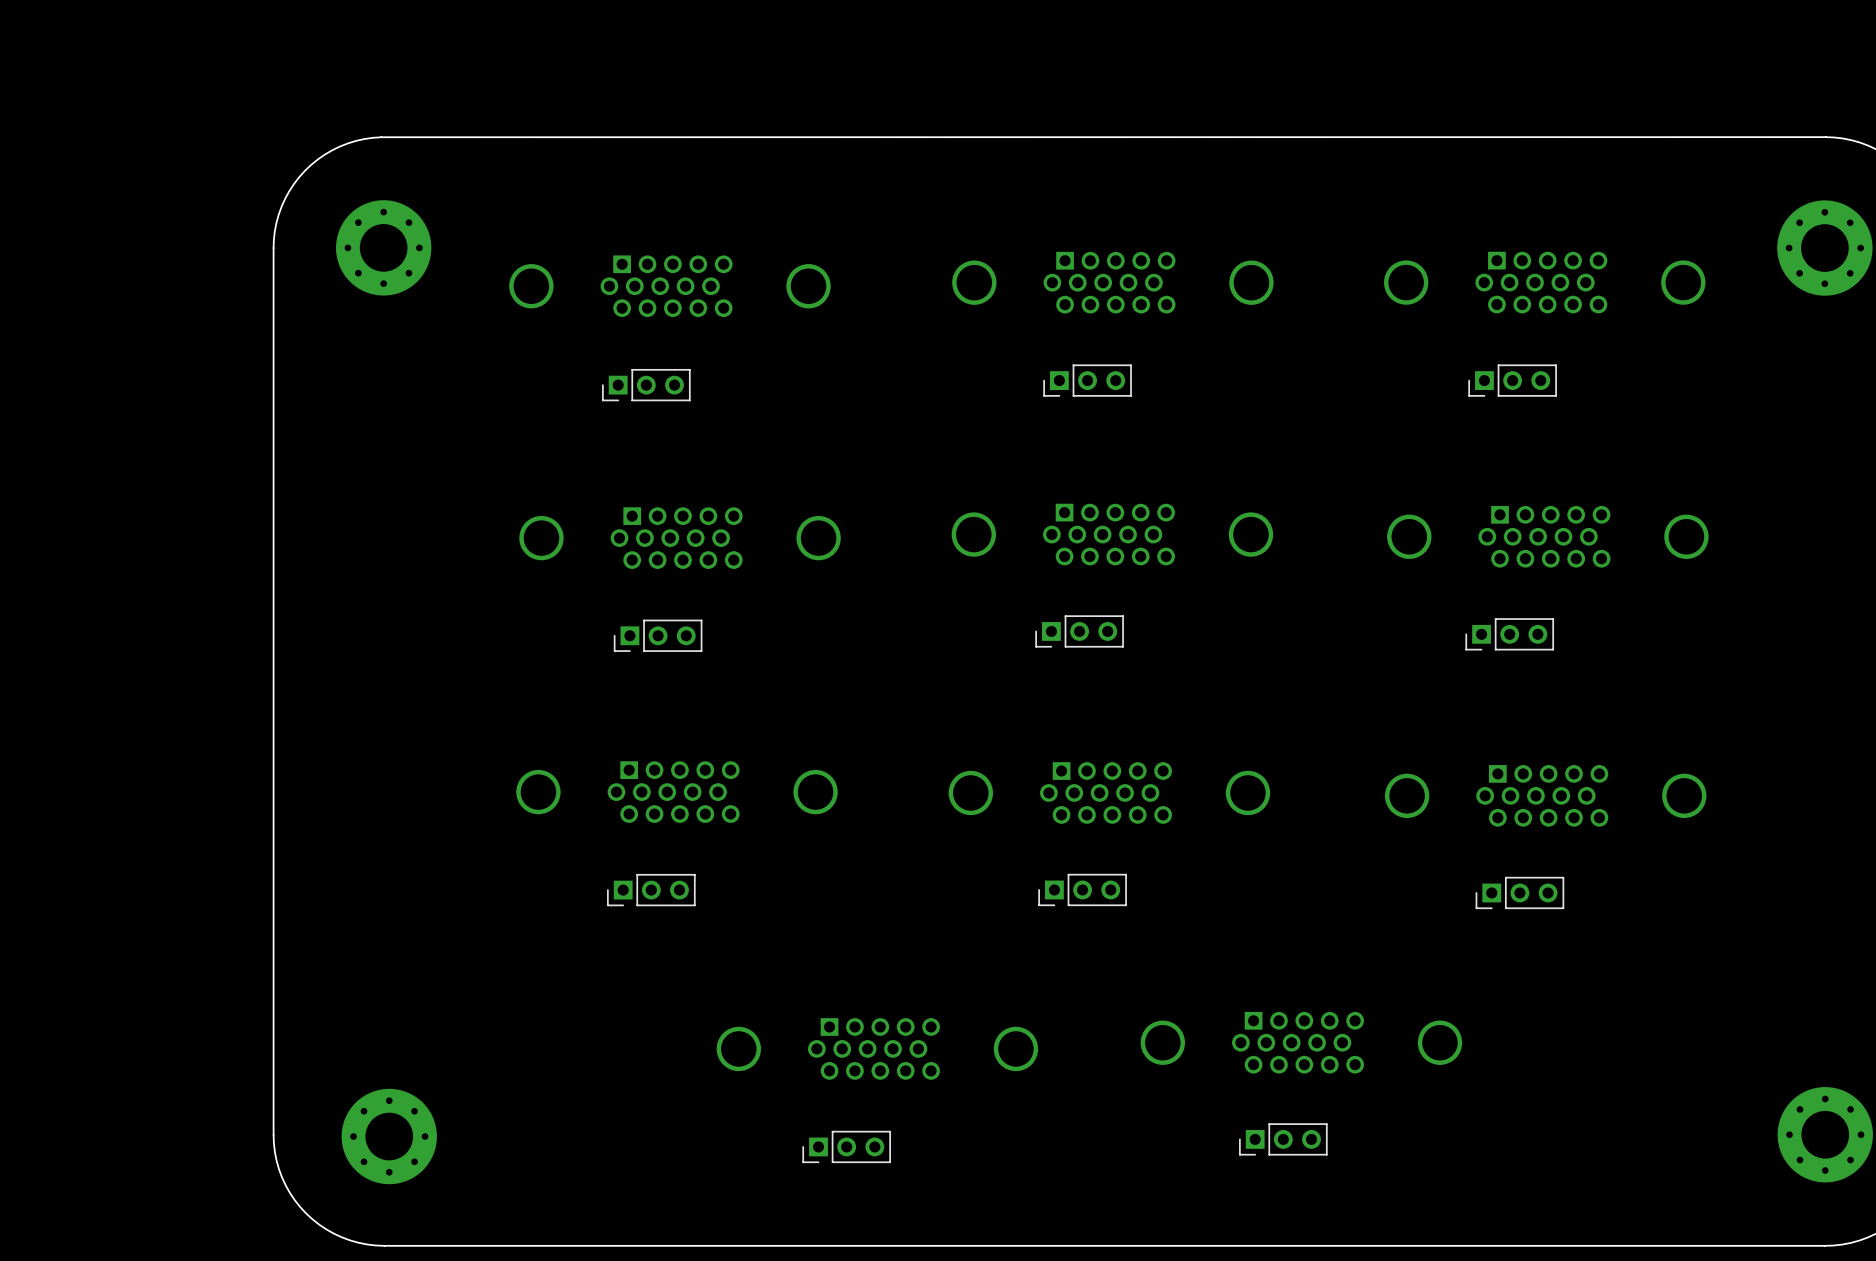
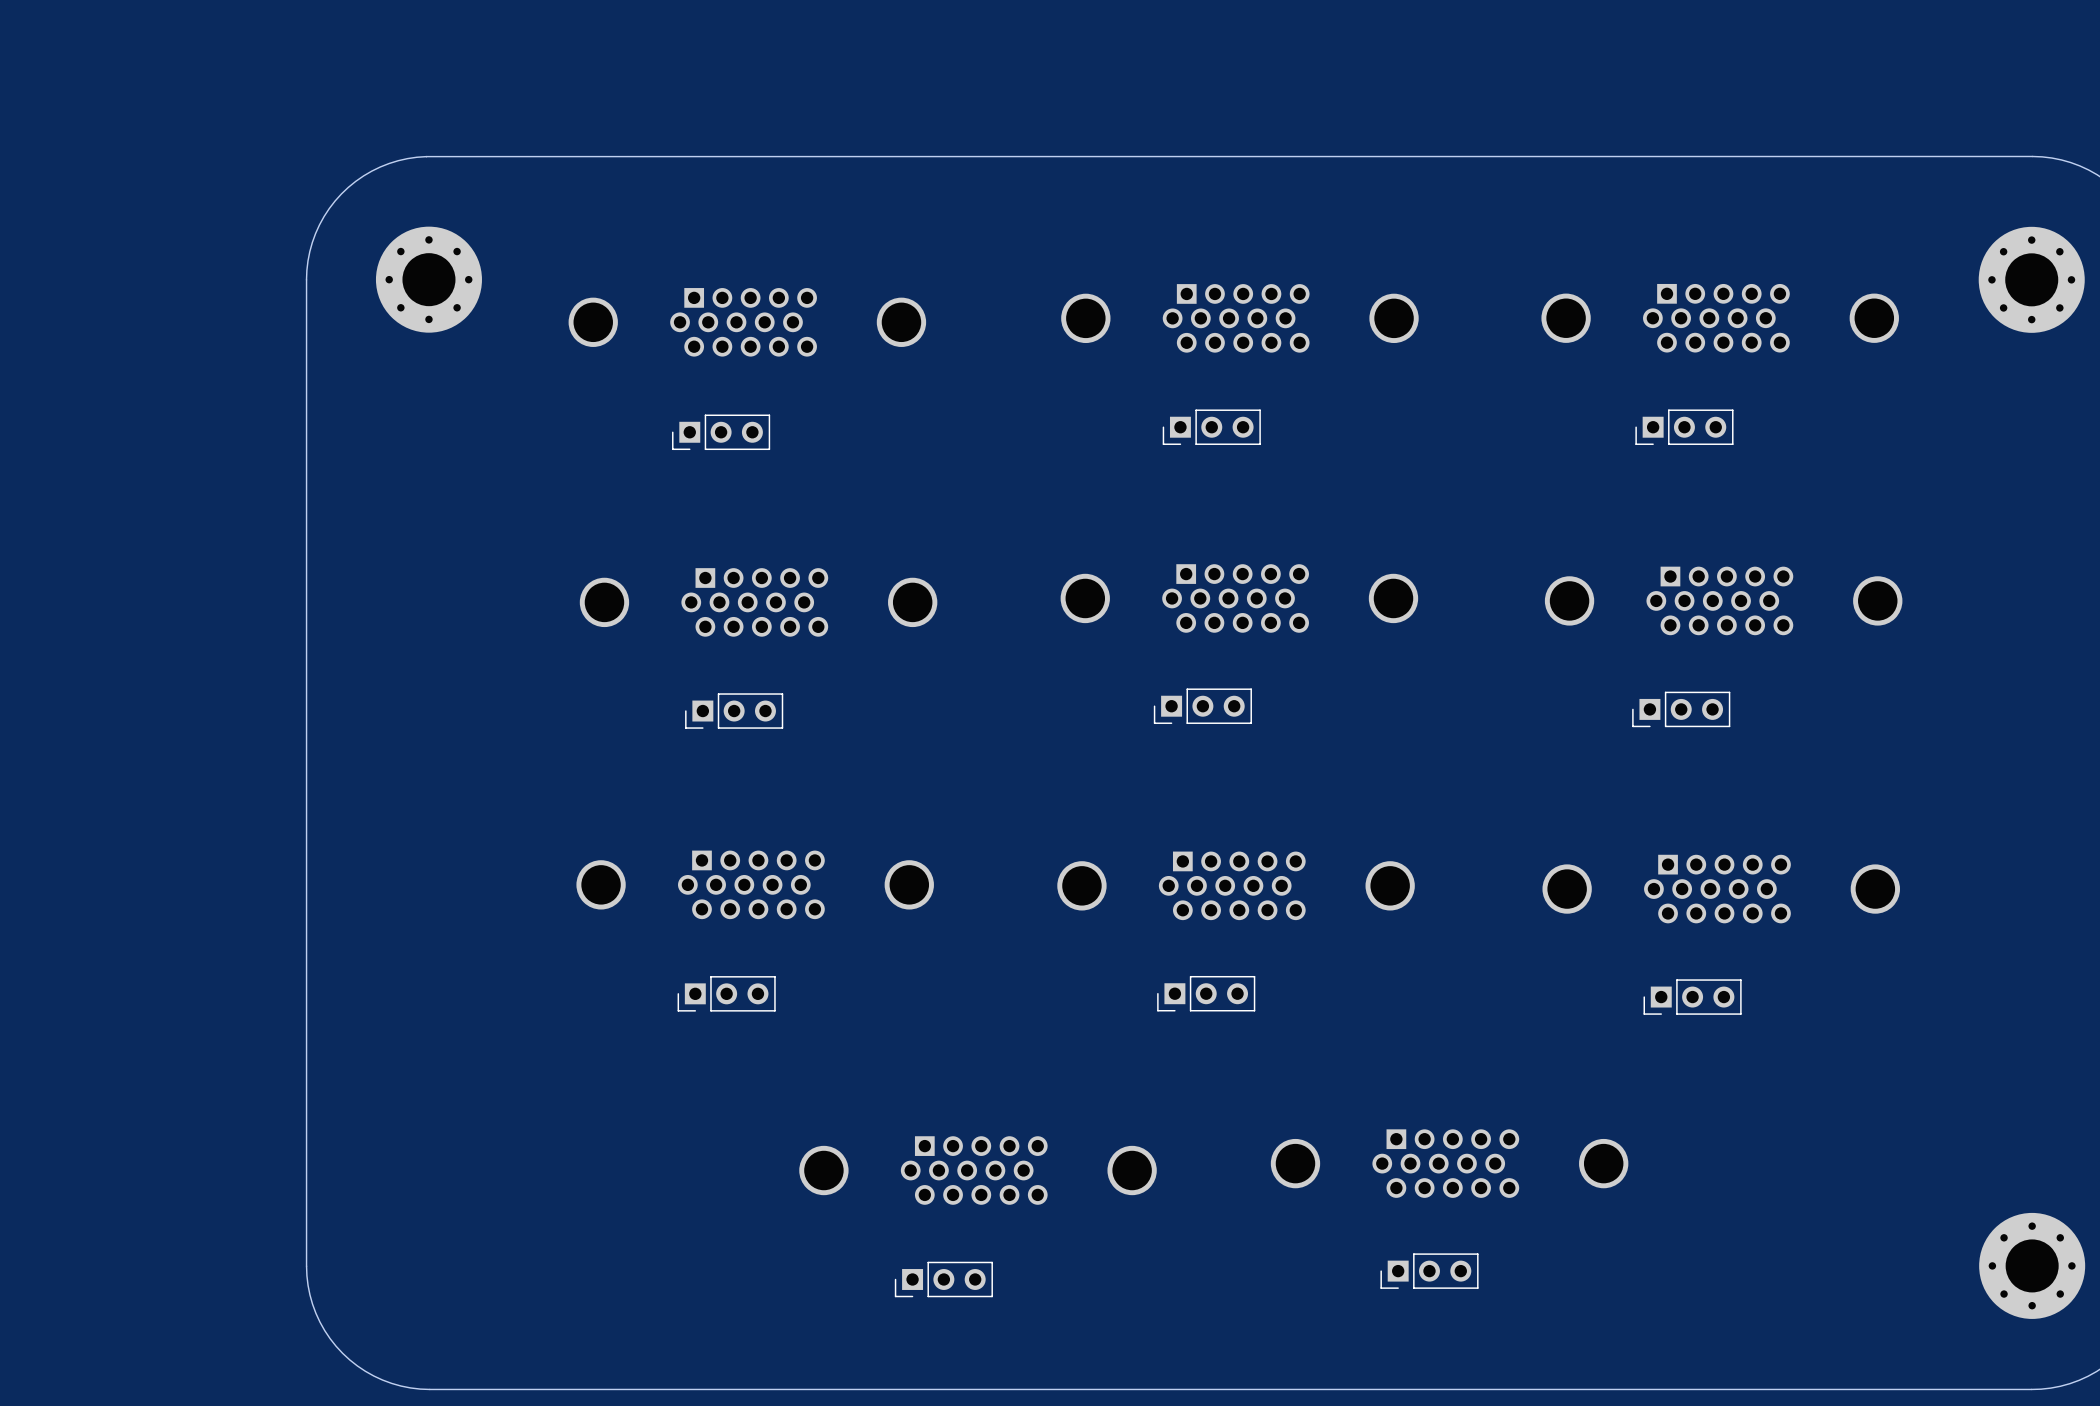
part: (389, 1136) -> none

